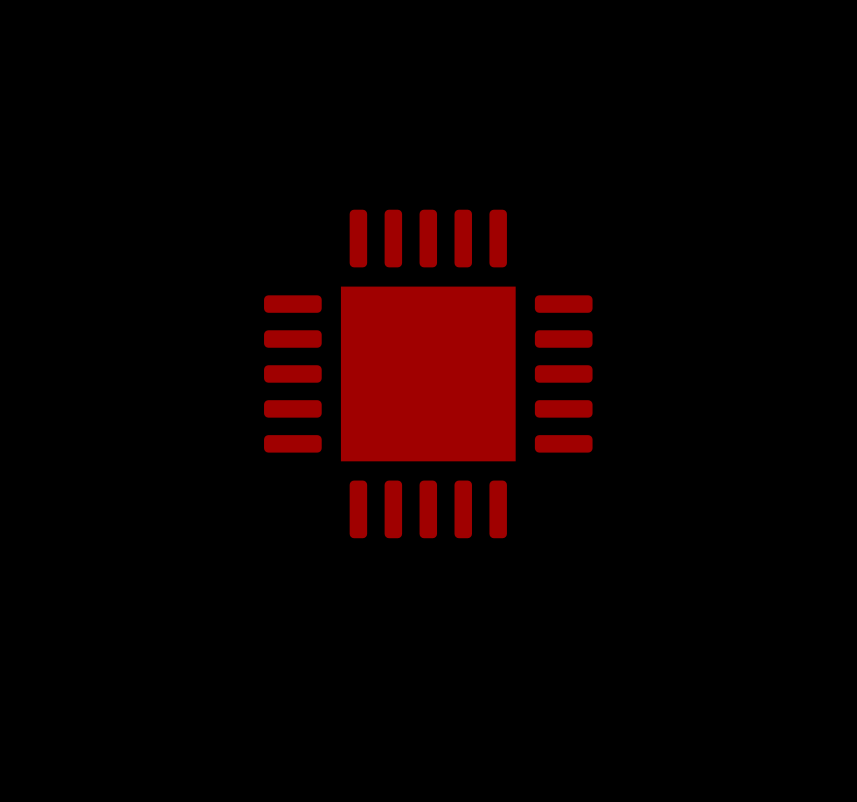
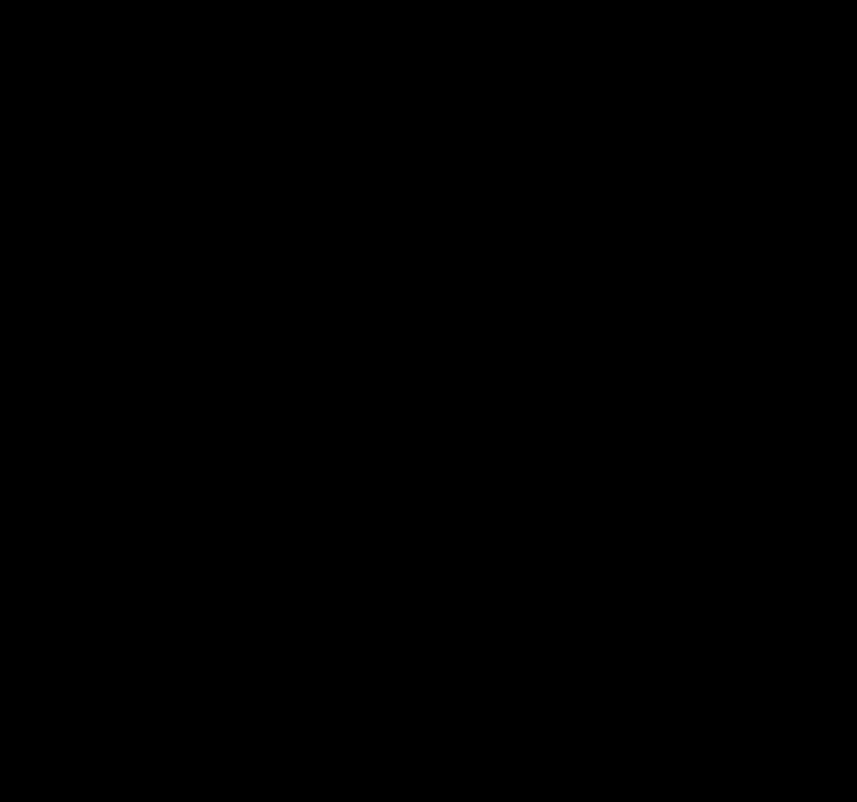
part: (428, 373) -> none

